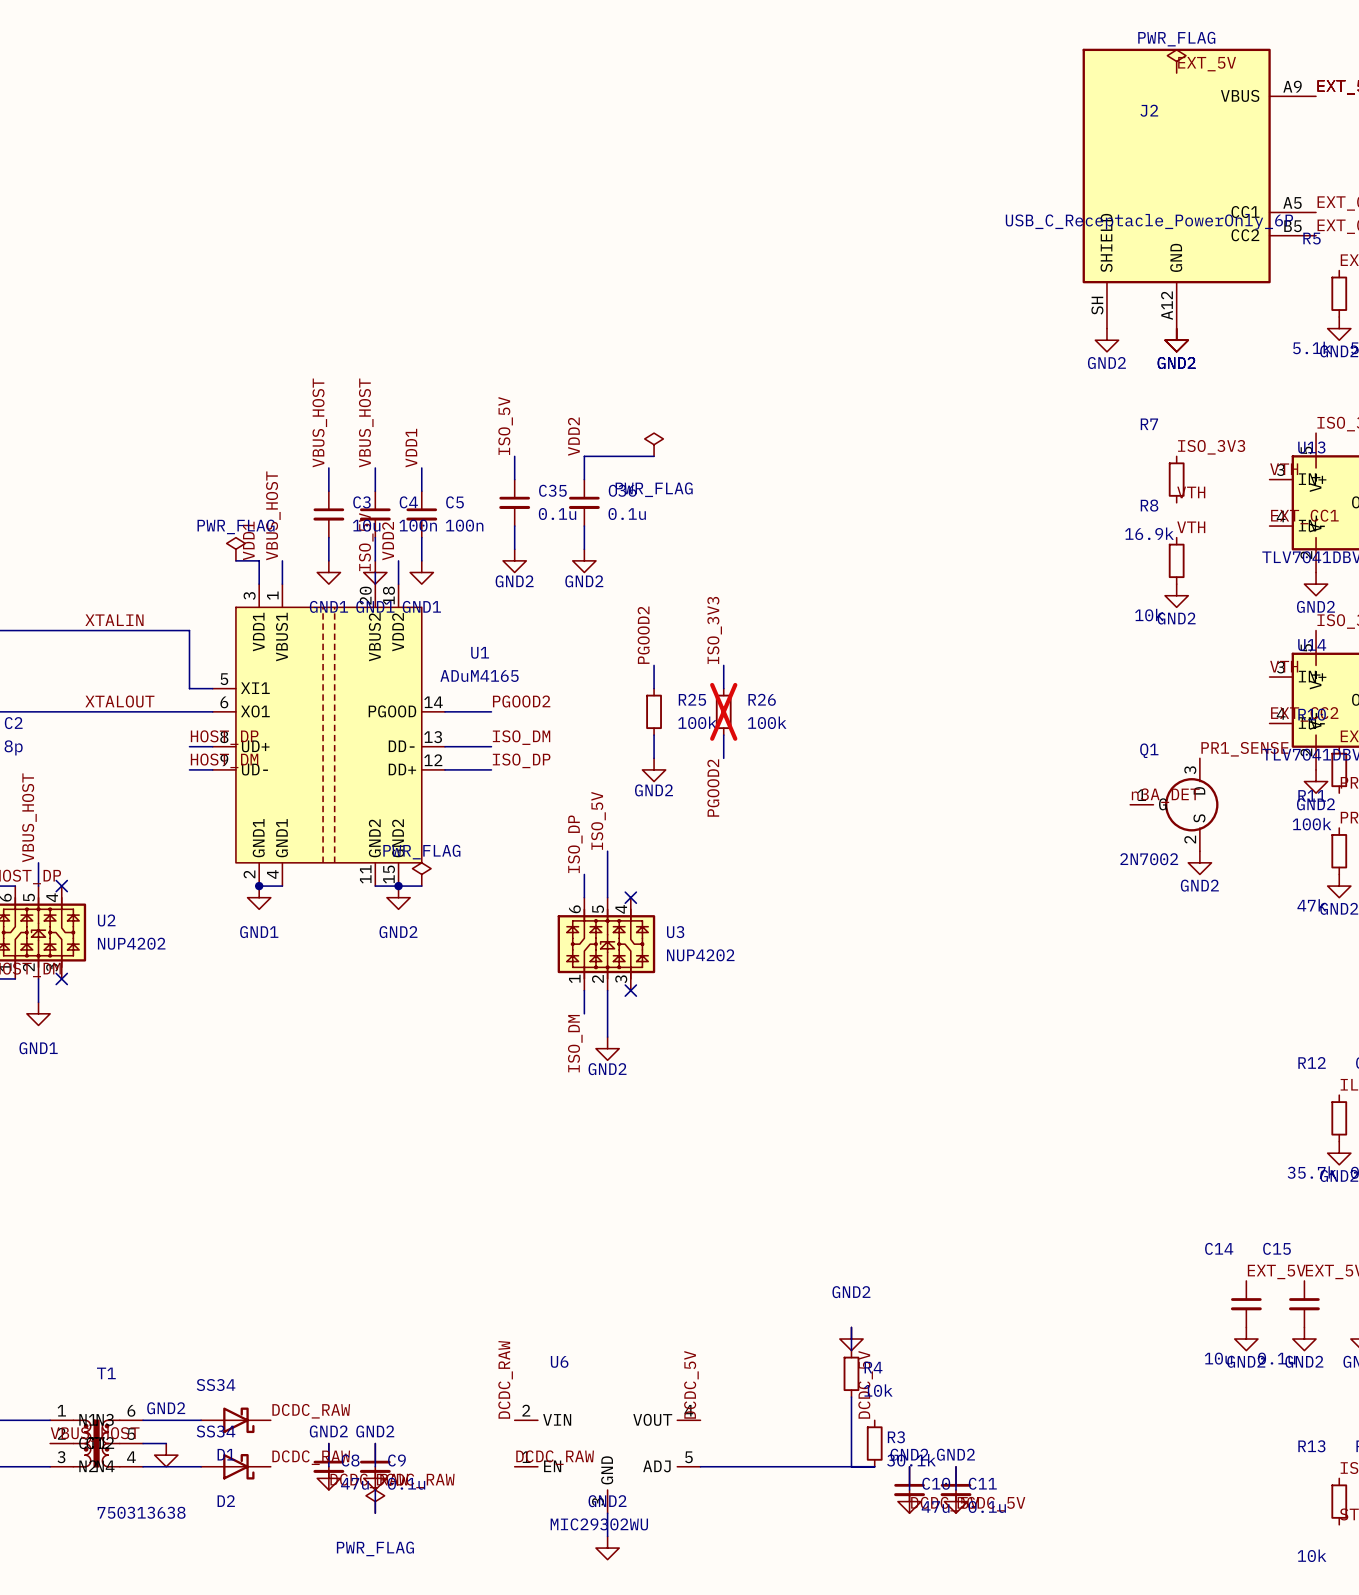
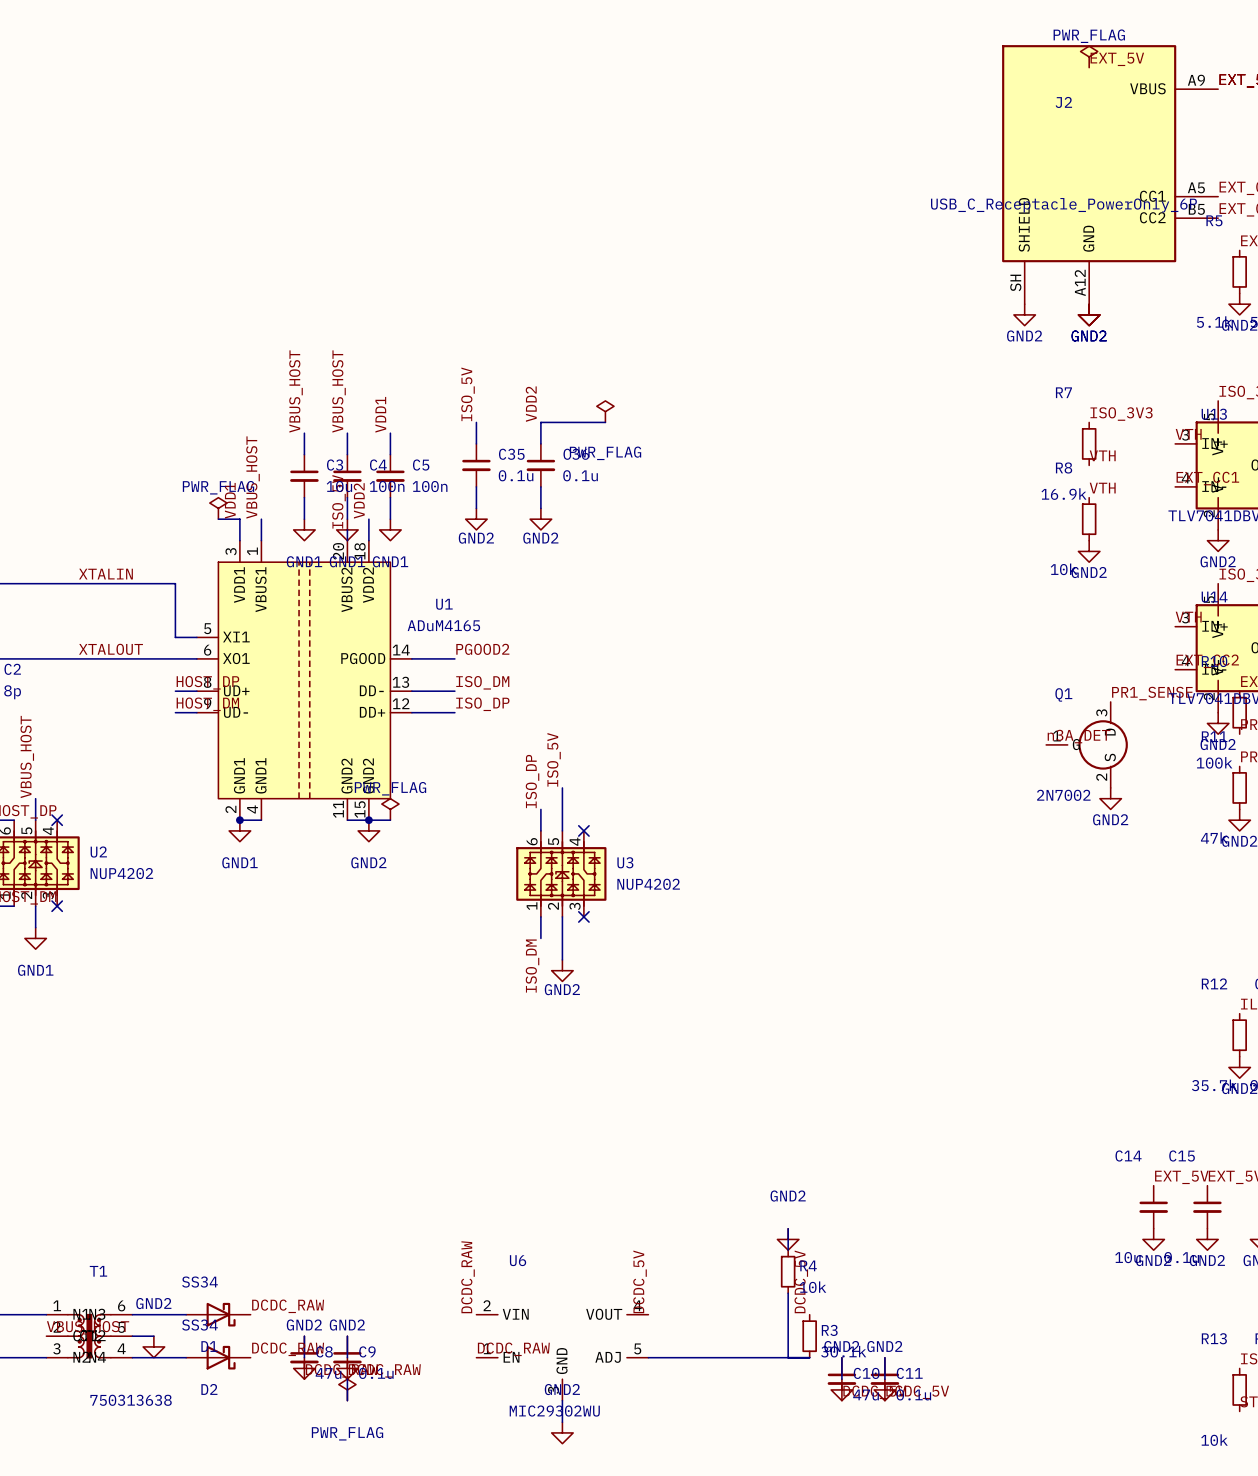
label: ISO_3V3 (714, 630) -> none
label: PGOOD2 (643, 635) -> none
wire: (654, 665) (654, 688) -> none
wire: (723, 665) (723, 688) -> none
R25: 100k (654, 711) -> none
R26: 100k (723, 711) -> none
wire: (654, 735) (654, 758) -> none
wire: (723, 735) (723, 758) -> none
power symbol: GND2 (654, 769) -> none
label: PGOOD2 (713, 788) -> none

